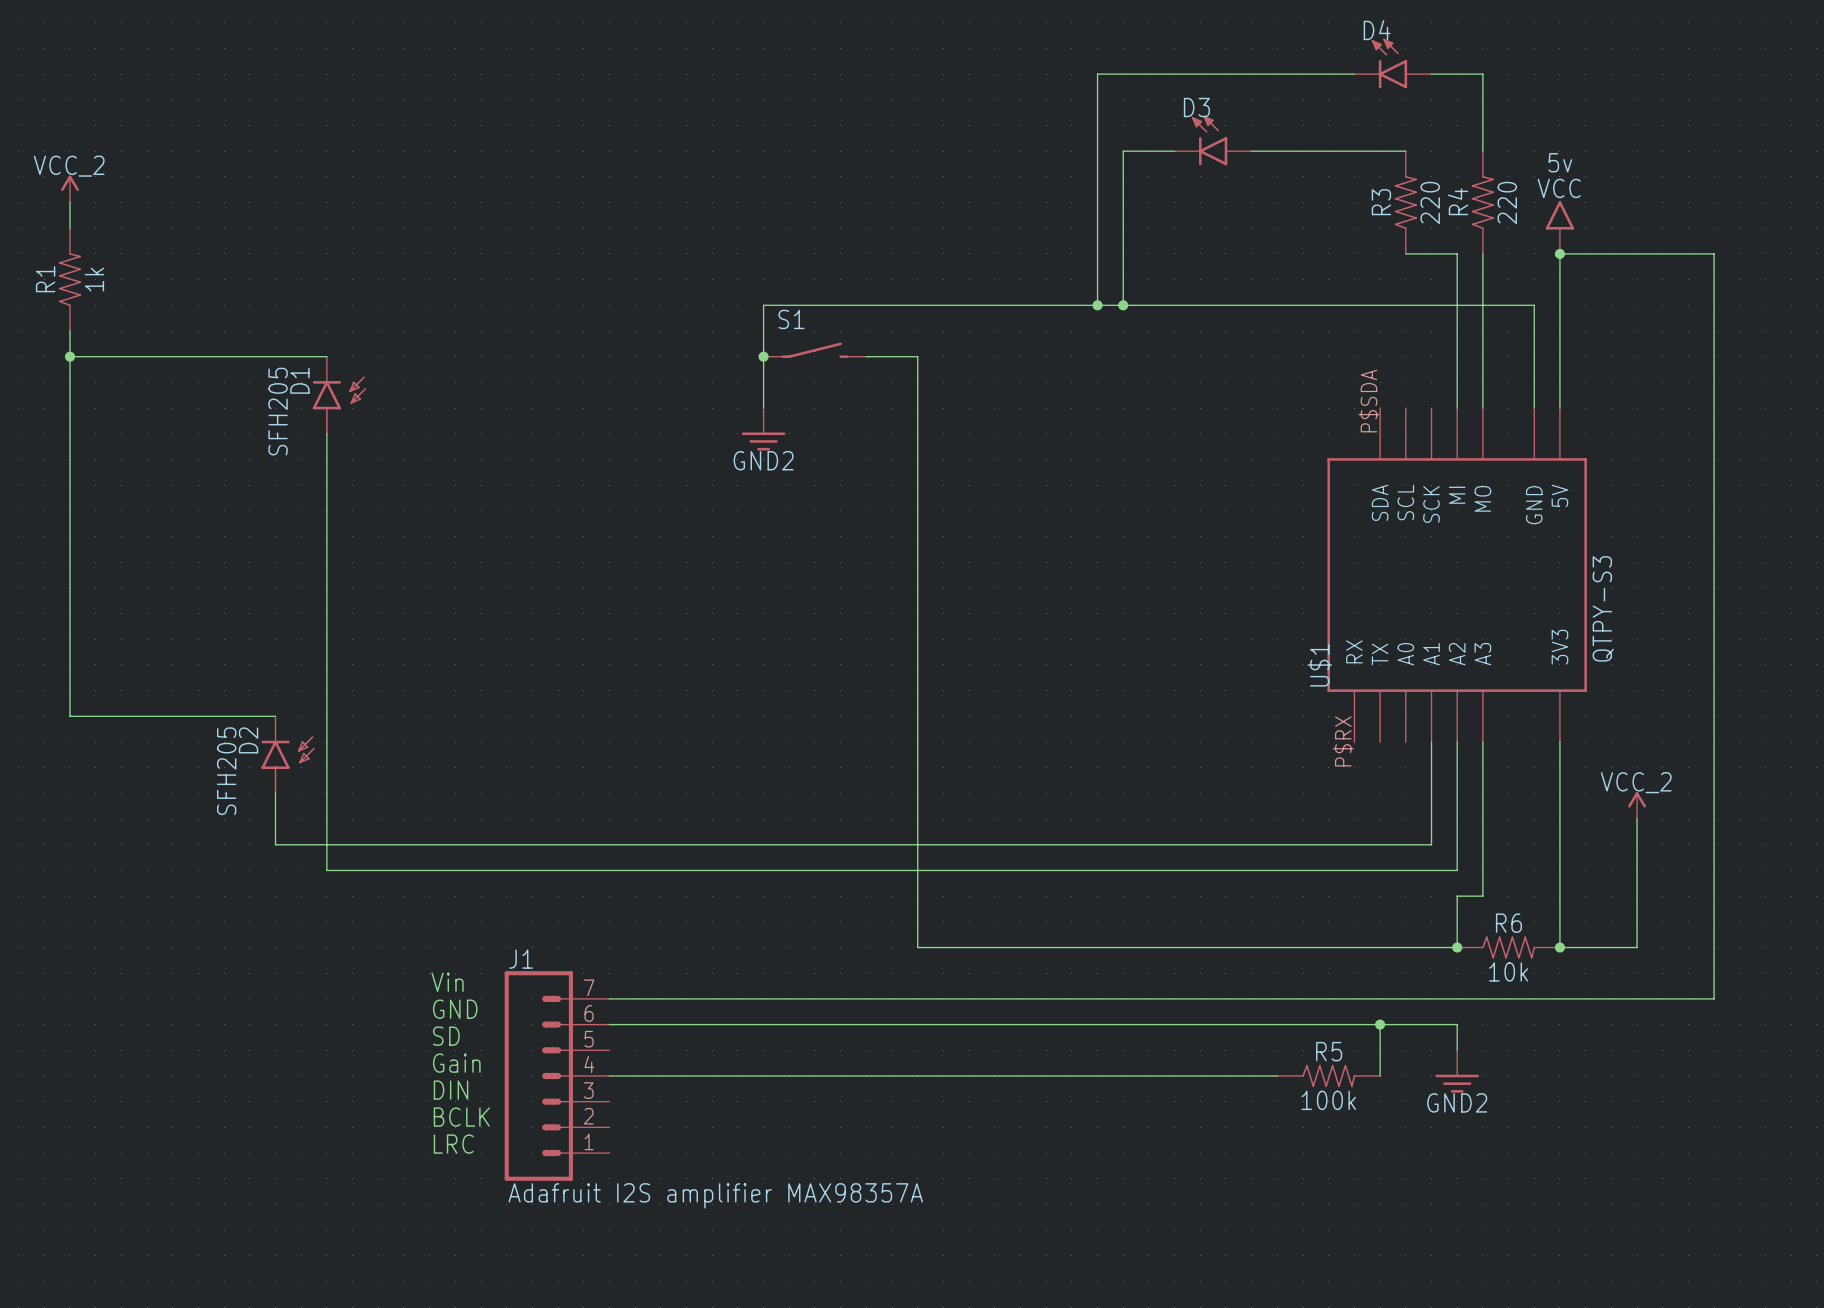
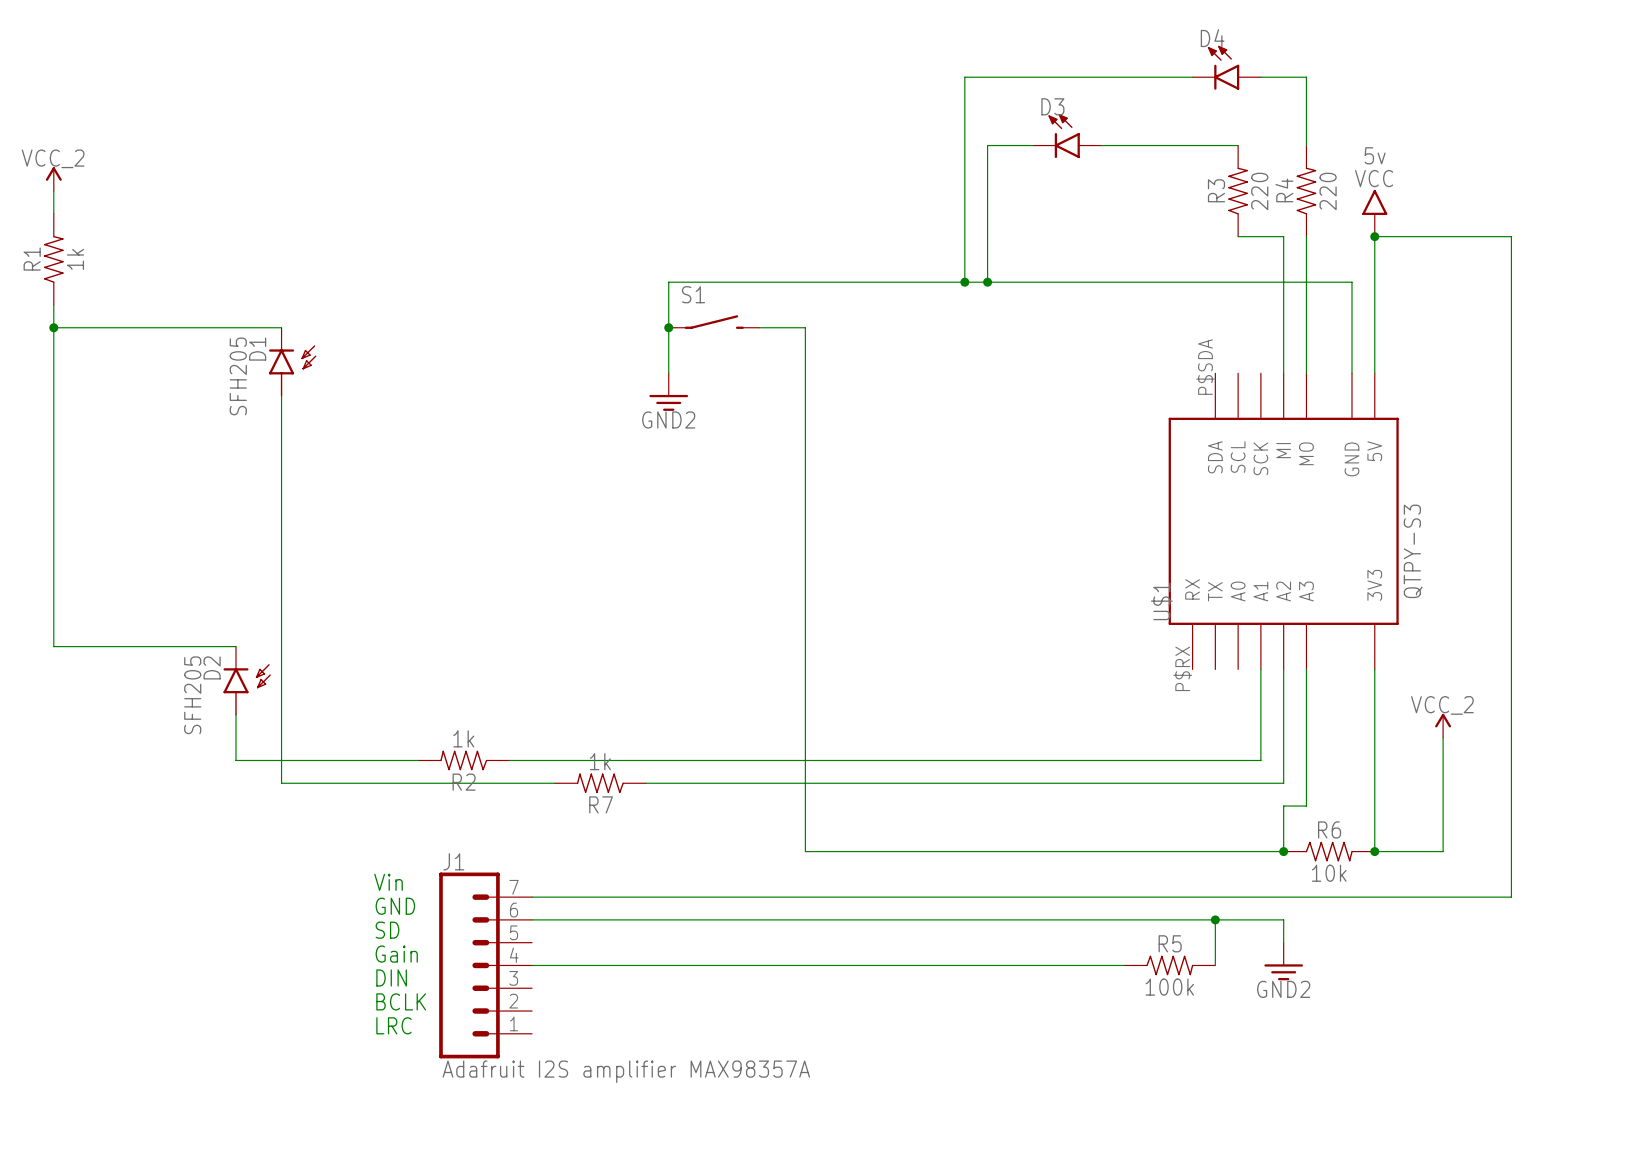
R2: none -> 1k (463, 760)
R7: none -> 1k (600, 783)

